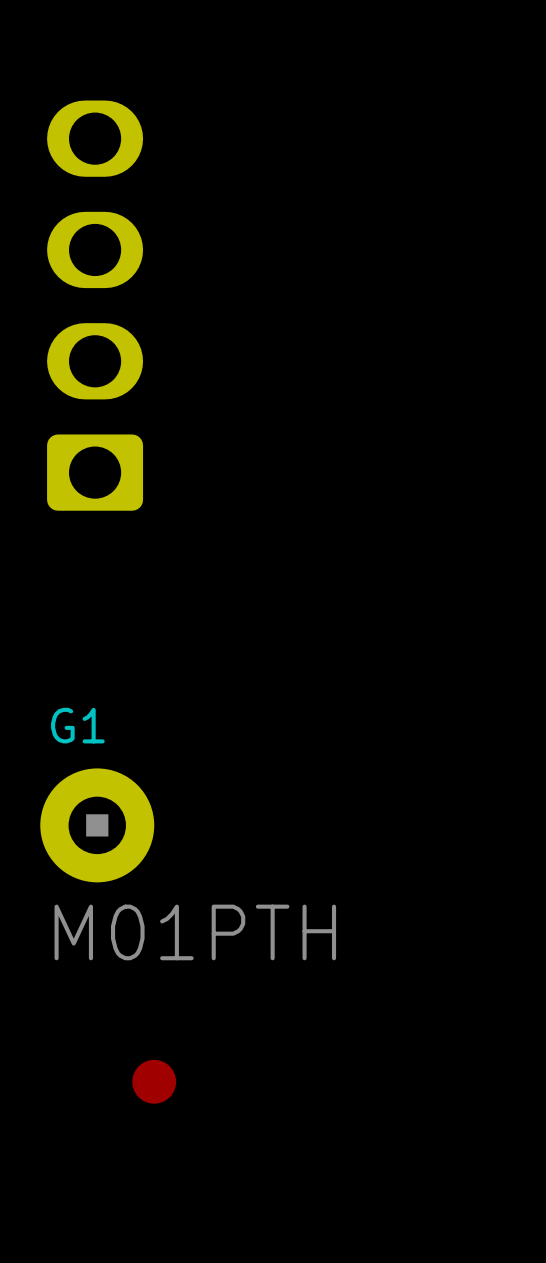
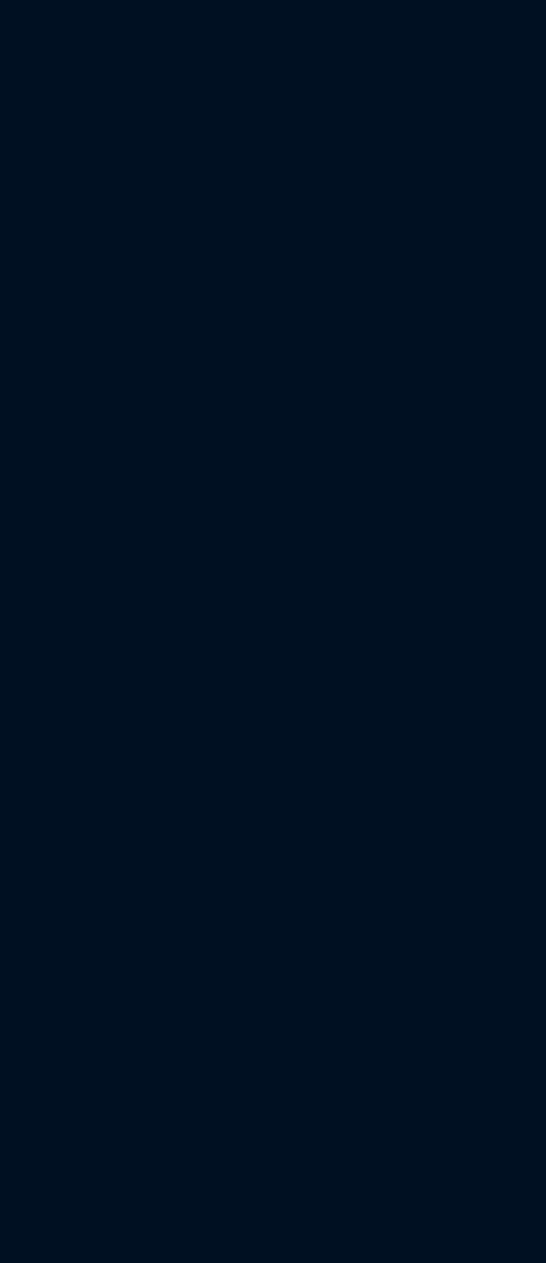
part: (95, 305) -> none
G1: M01PTH (97, 825) -> none
part: (154, 1081) -> none

